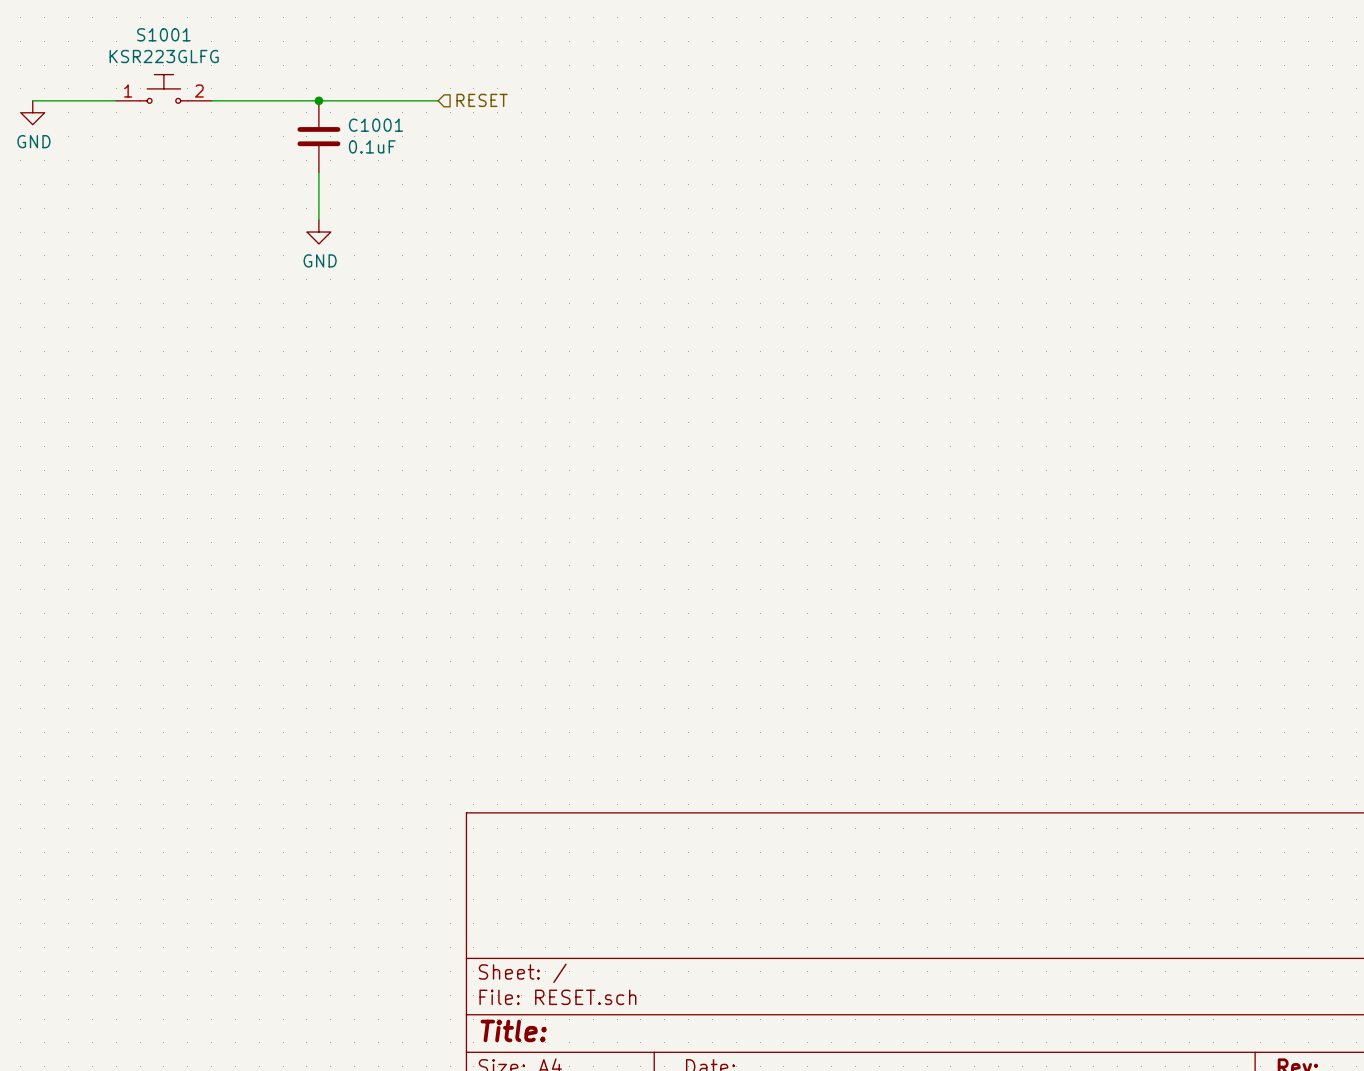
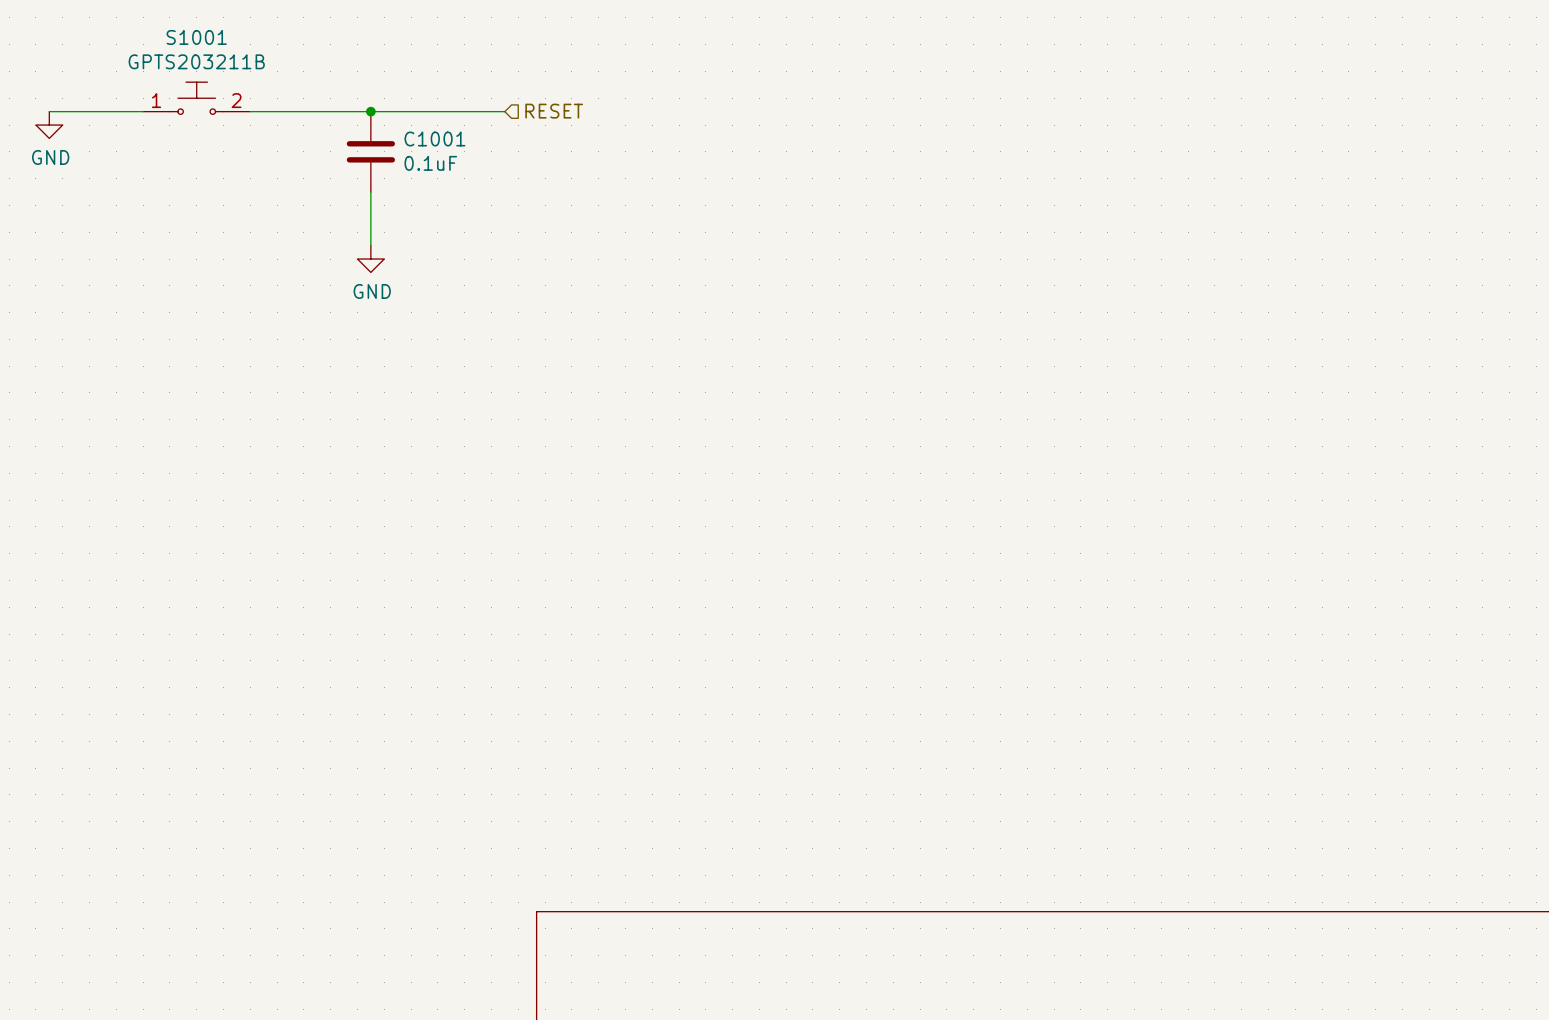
S1001 value: KSR223GLFG (164, 56) -> GPTS203211B (196, 61)

